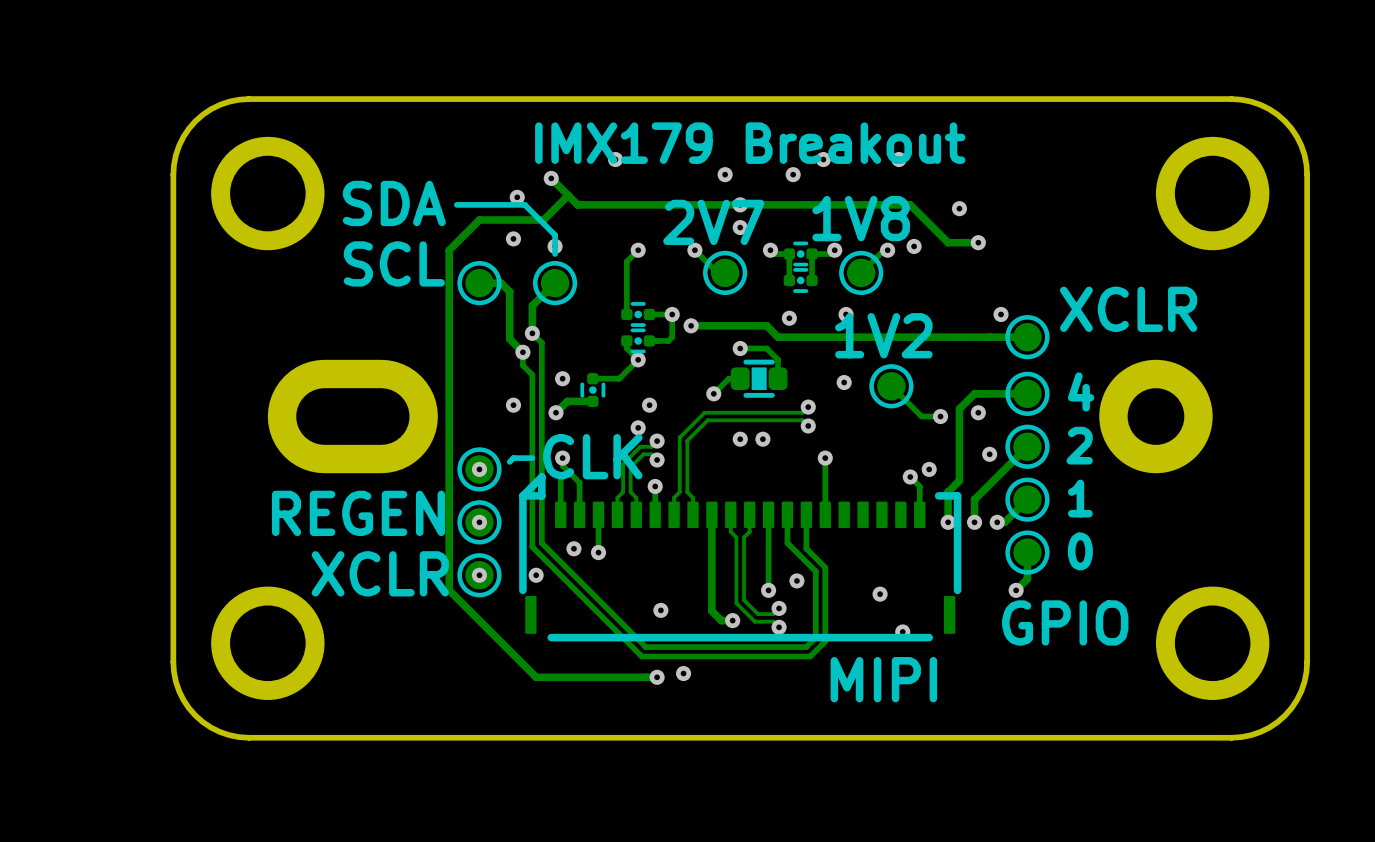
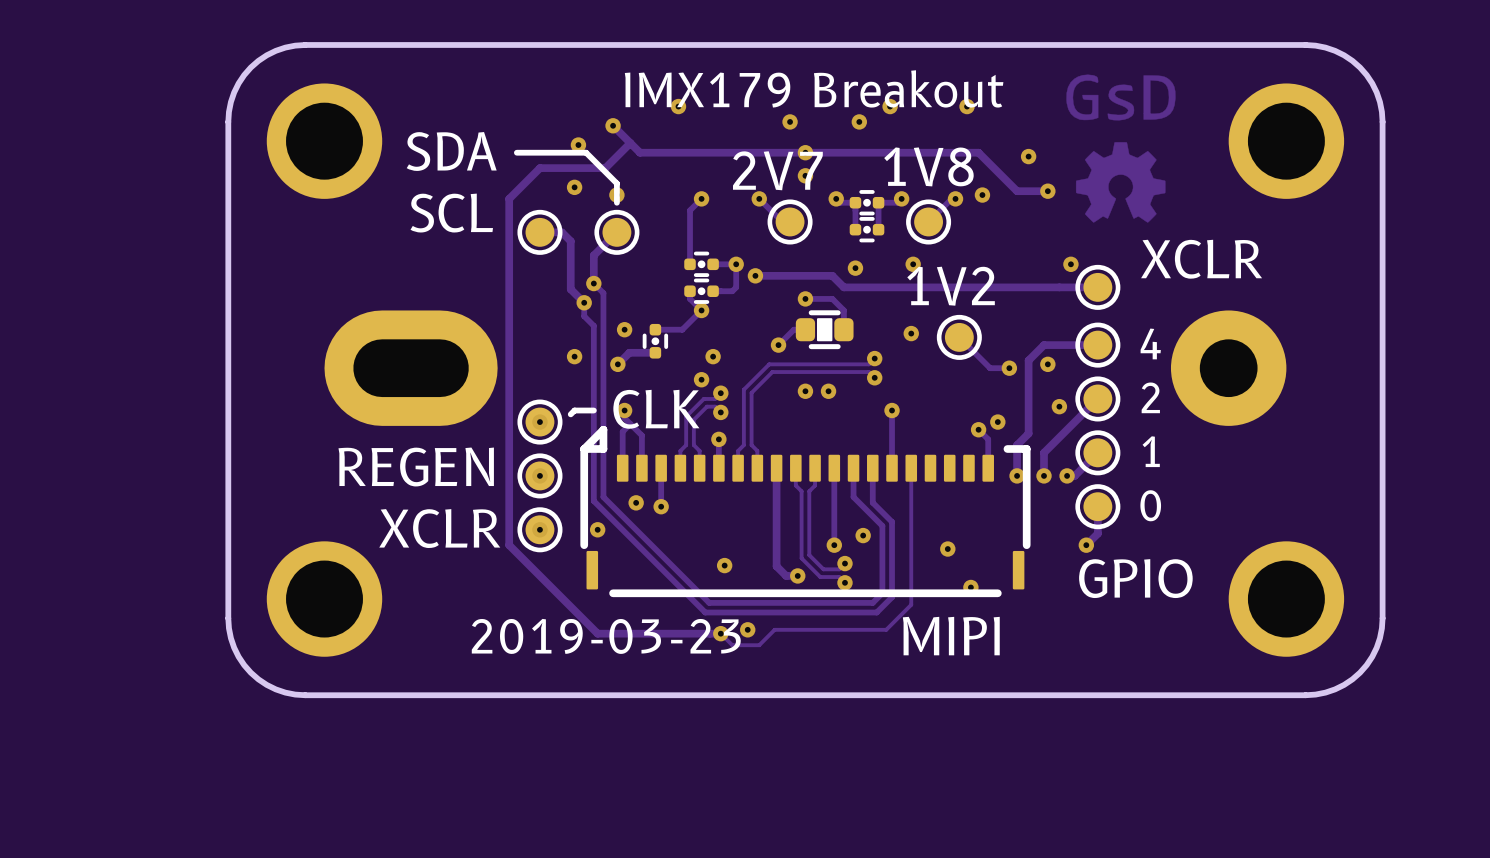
drawing: none -> [1066, 74, 1176, 223]
track: none -> (911, 468) (911, 604) (886, 629) (774, 629) (759, 645) (732, 645) (720, 633)
text: none -> 2019-03-23 (606, 636)

